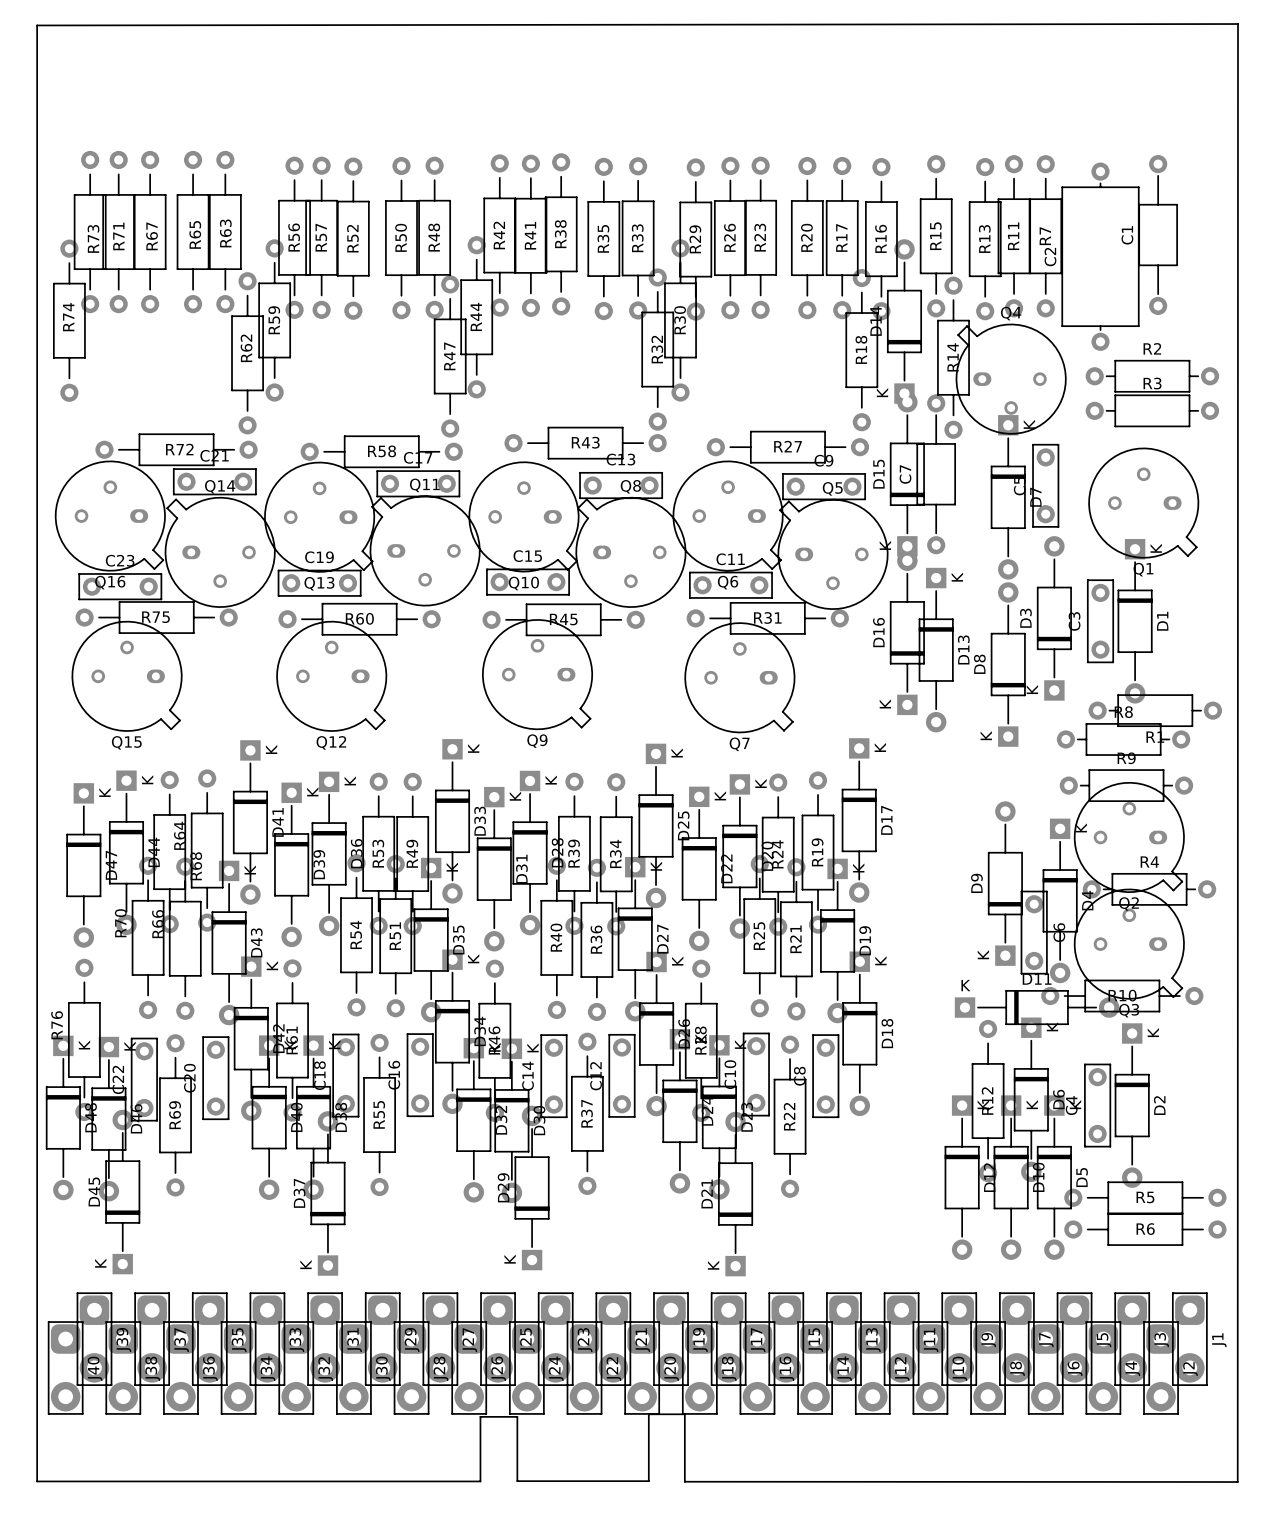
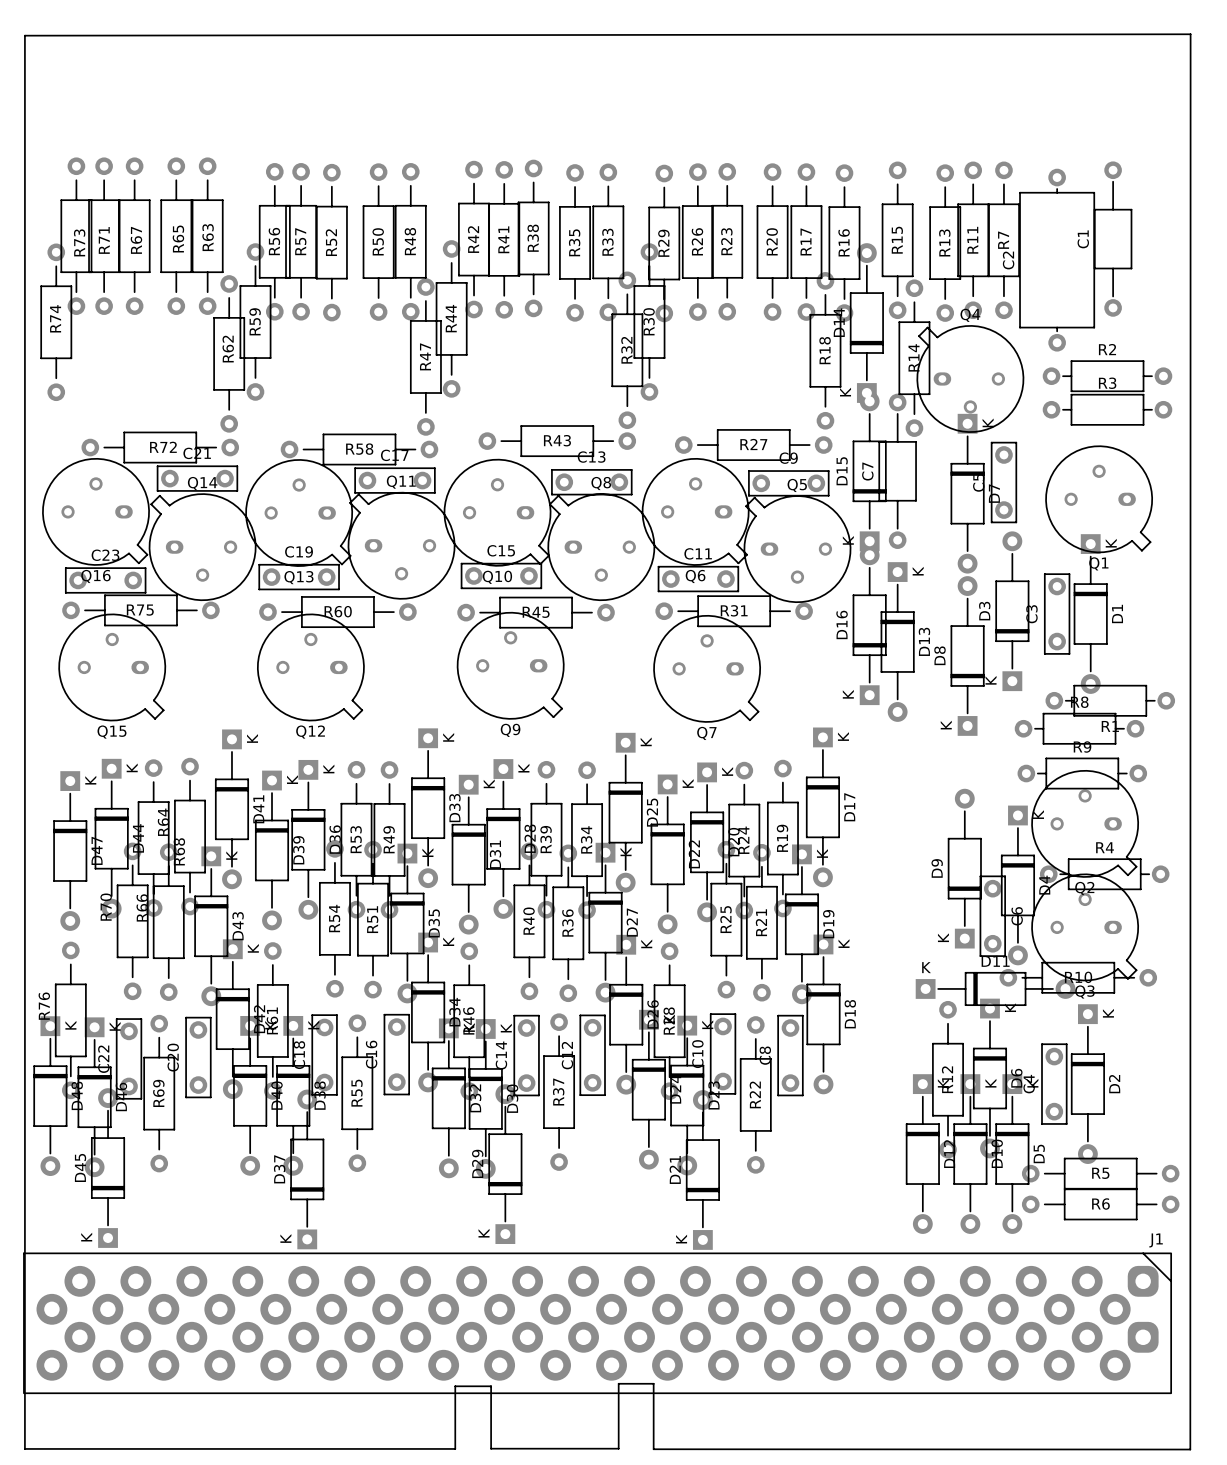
J1 footprint: [1172, 1292, 1208, 1386] -> [23, 1252, 1172, 1394]
J39: (94, 1339) -> none
J37: (152, 1339) -> none
J35: (209, 1339) -> none
J33: (267, 1339) -> none
J31: (325, 1339) -> none
J29: (382, 1339) -> none
J27: (440, 1339) -> none
J25: (498, 1339) -> none
J23: (555, 1339) -> none
J21: (613, 1339) -> none
J19: (671, 1339) -> none
J17: (728, 1339) -> none
J15: (786, 1339) -> none
J13: (843, 1339) -> none
J11: (901, 1339) -> none
J9: (959, 1339) -> none
J7: (1016, 1339) -> none
J5: (1074, 1339) -> none
J3: (1132, 1339) -> none
J1 name position: J1 (1219, 1340) -> J1 (1156, 1240)
J40: (65, 1367) -> none
J38: (123, 1367) -> none
J36: (180, 1367) -> none
J34: (238, 1367) -> none
J32: (296, 1367) -> none
J30: (353, 1367) -> none
J28: (411, 1367) -> none
J26: (469, 1367) -> none
J24: (526, 1367) -> none
J22: (584, 1367) -> none
J20: (642, 1367) -> none
J18: (699, 1367) -> none
J16: (757, 1367) -> none
J14: (815, 1367) -> none
J12: (872, 1367) -> none
J10: (930, 1367) -> none
J8: (988, 1367) -> none
J6: (1045, 1367) -> none
J4: (1103, 1367) -> none
J2: (1161, 1367) -> none

